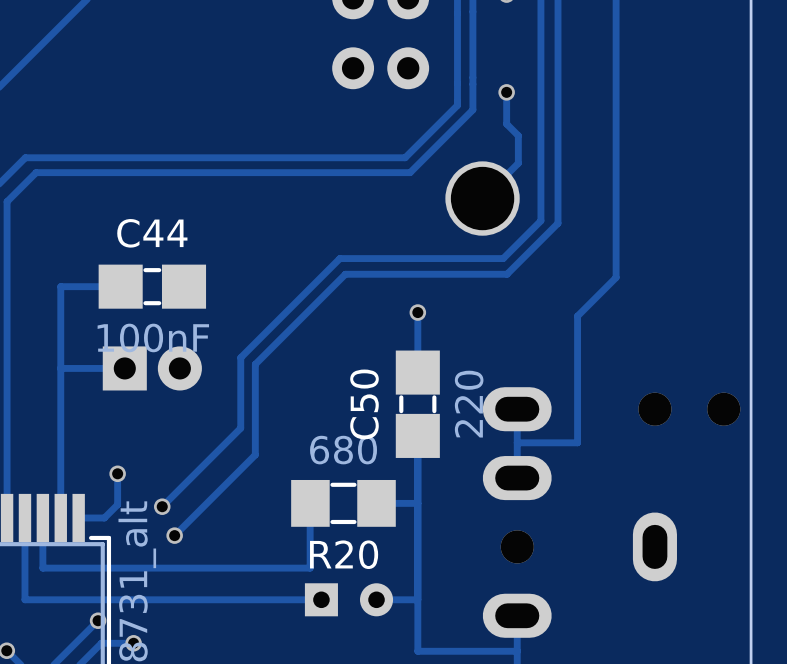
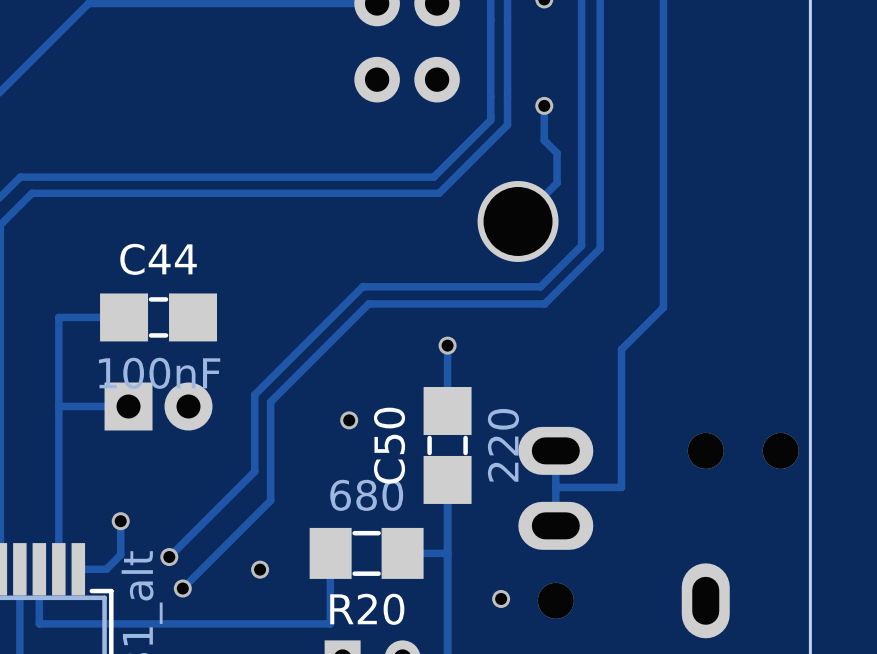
via: none -> (349, 420)
via: none -> (260, 569)
via: none -> (501, 598)

